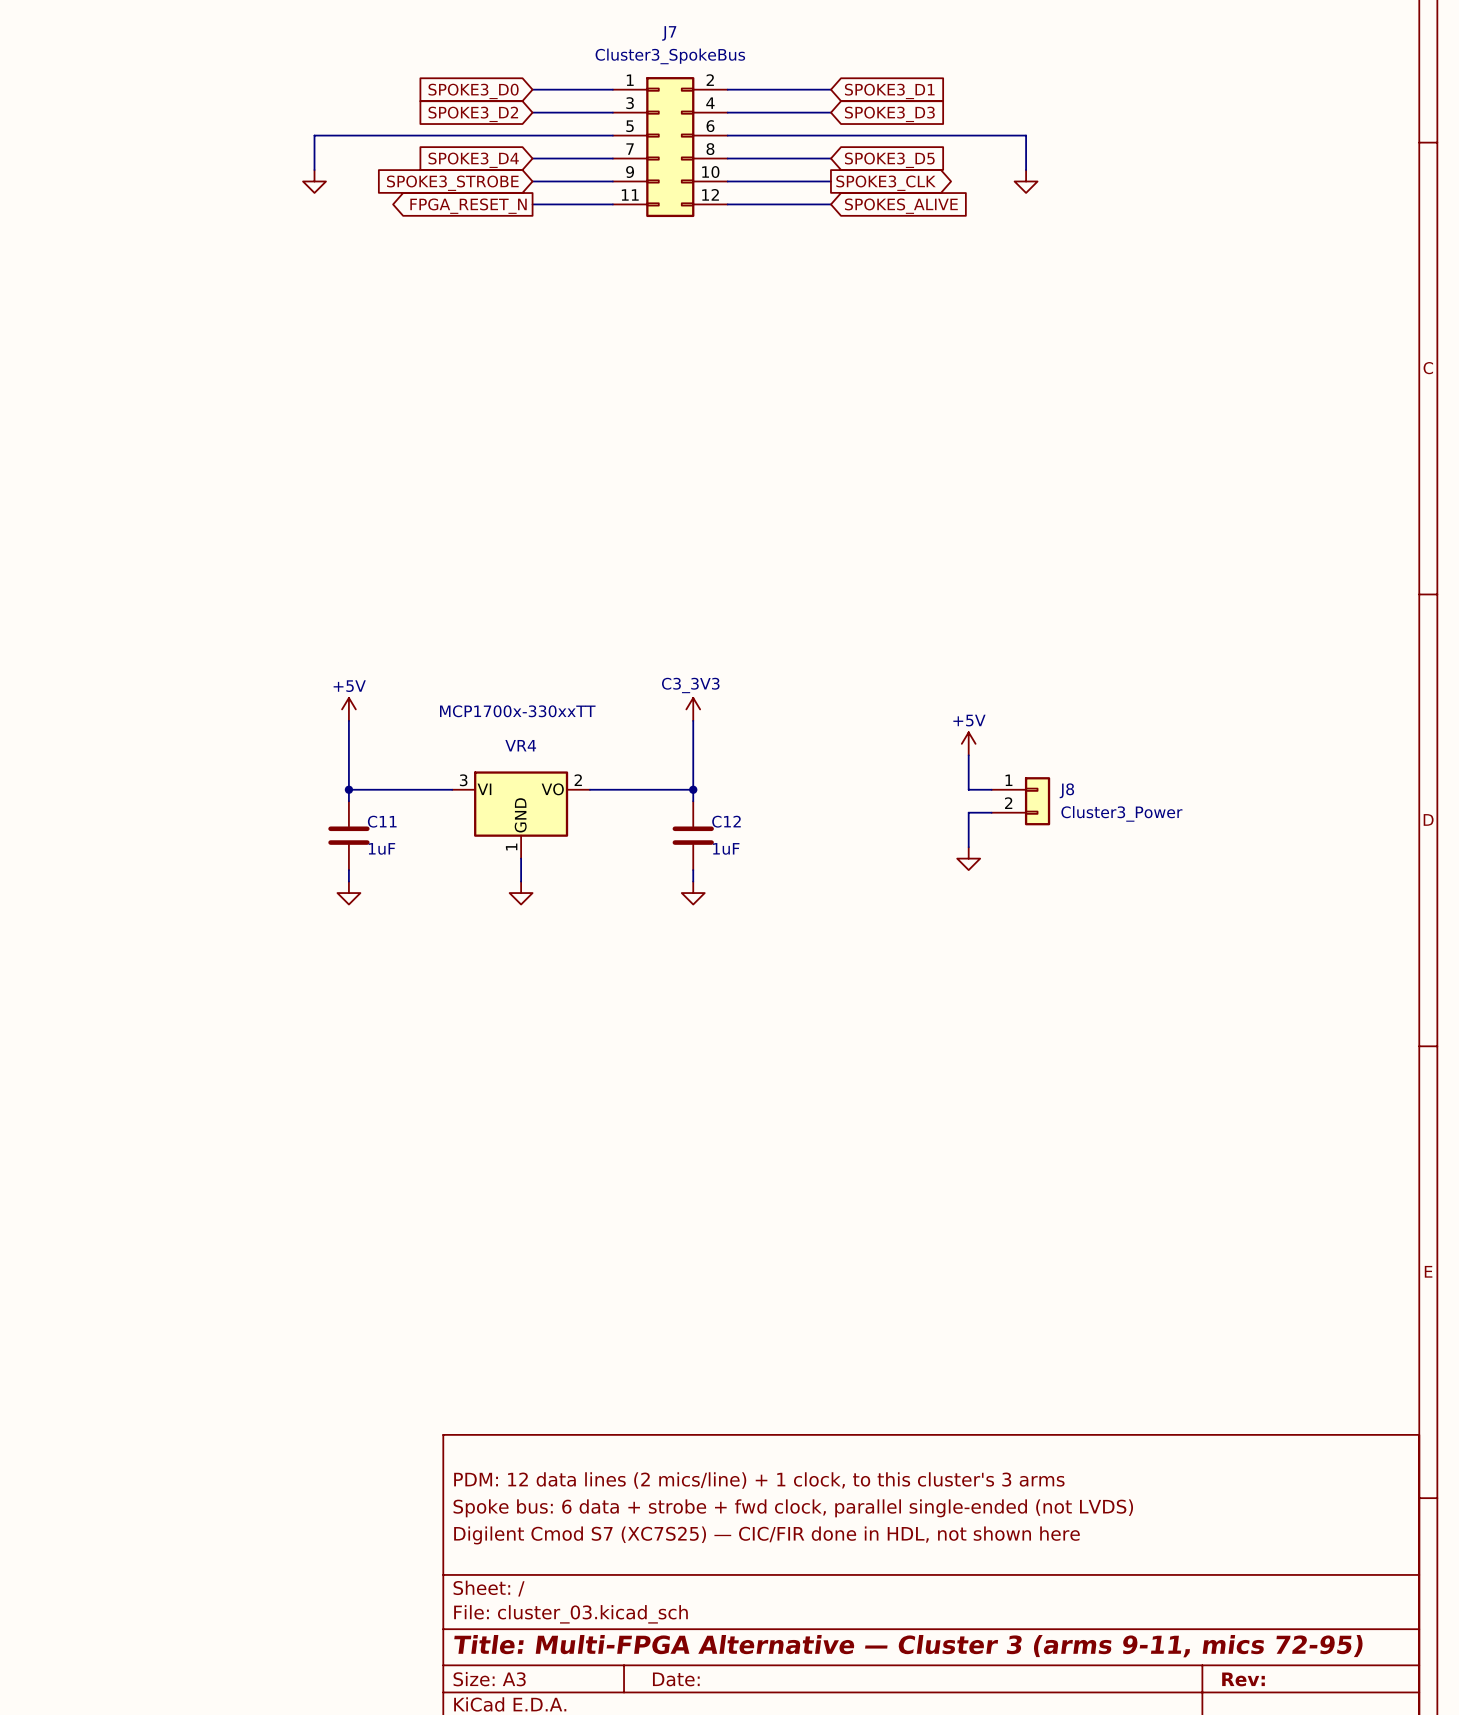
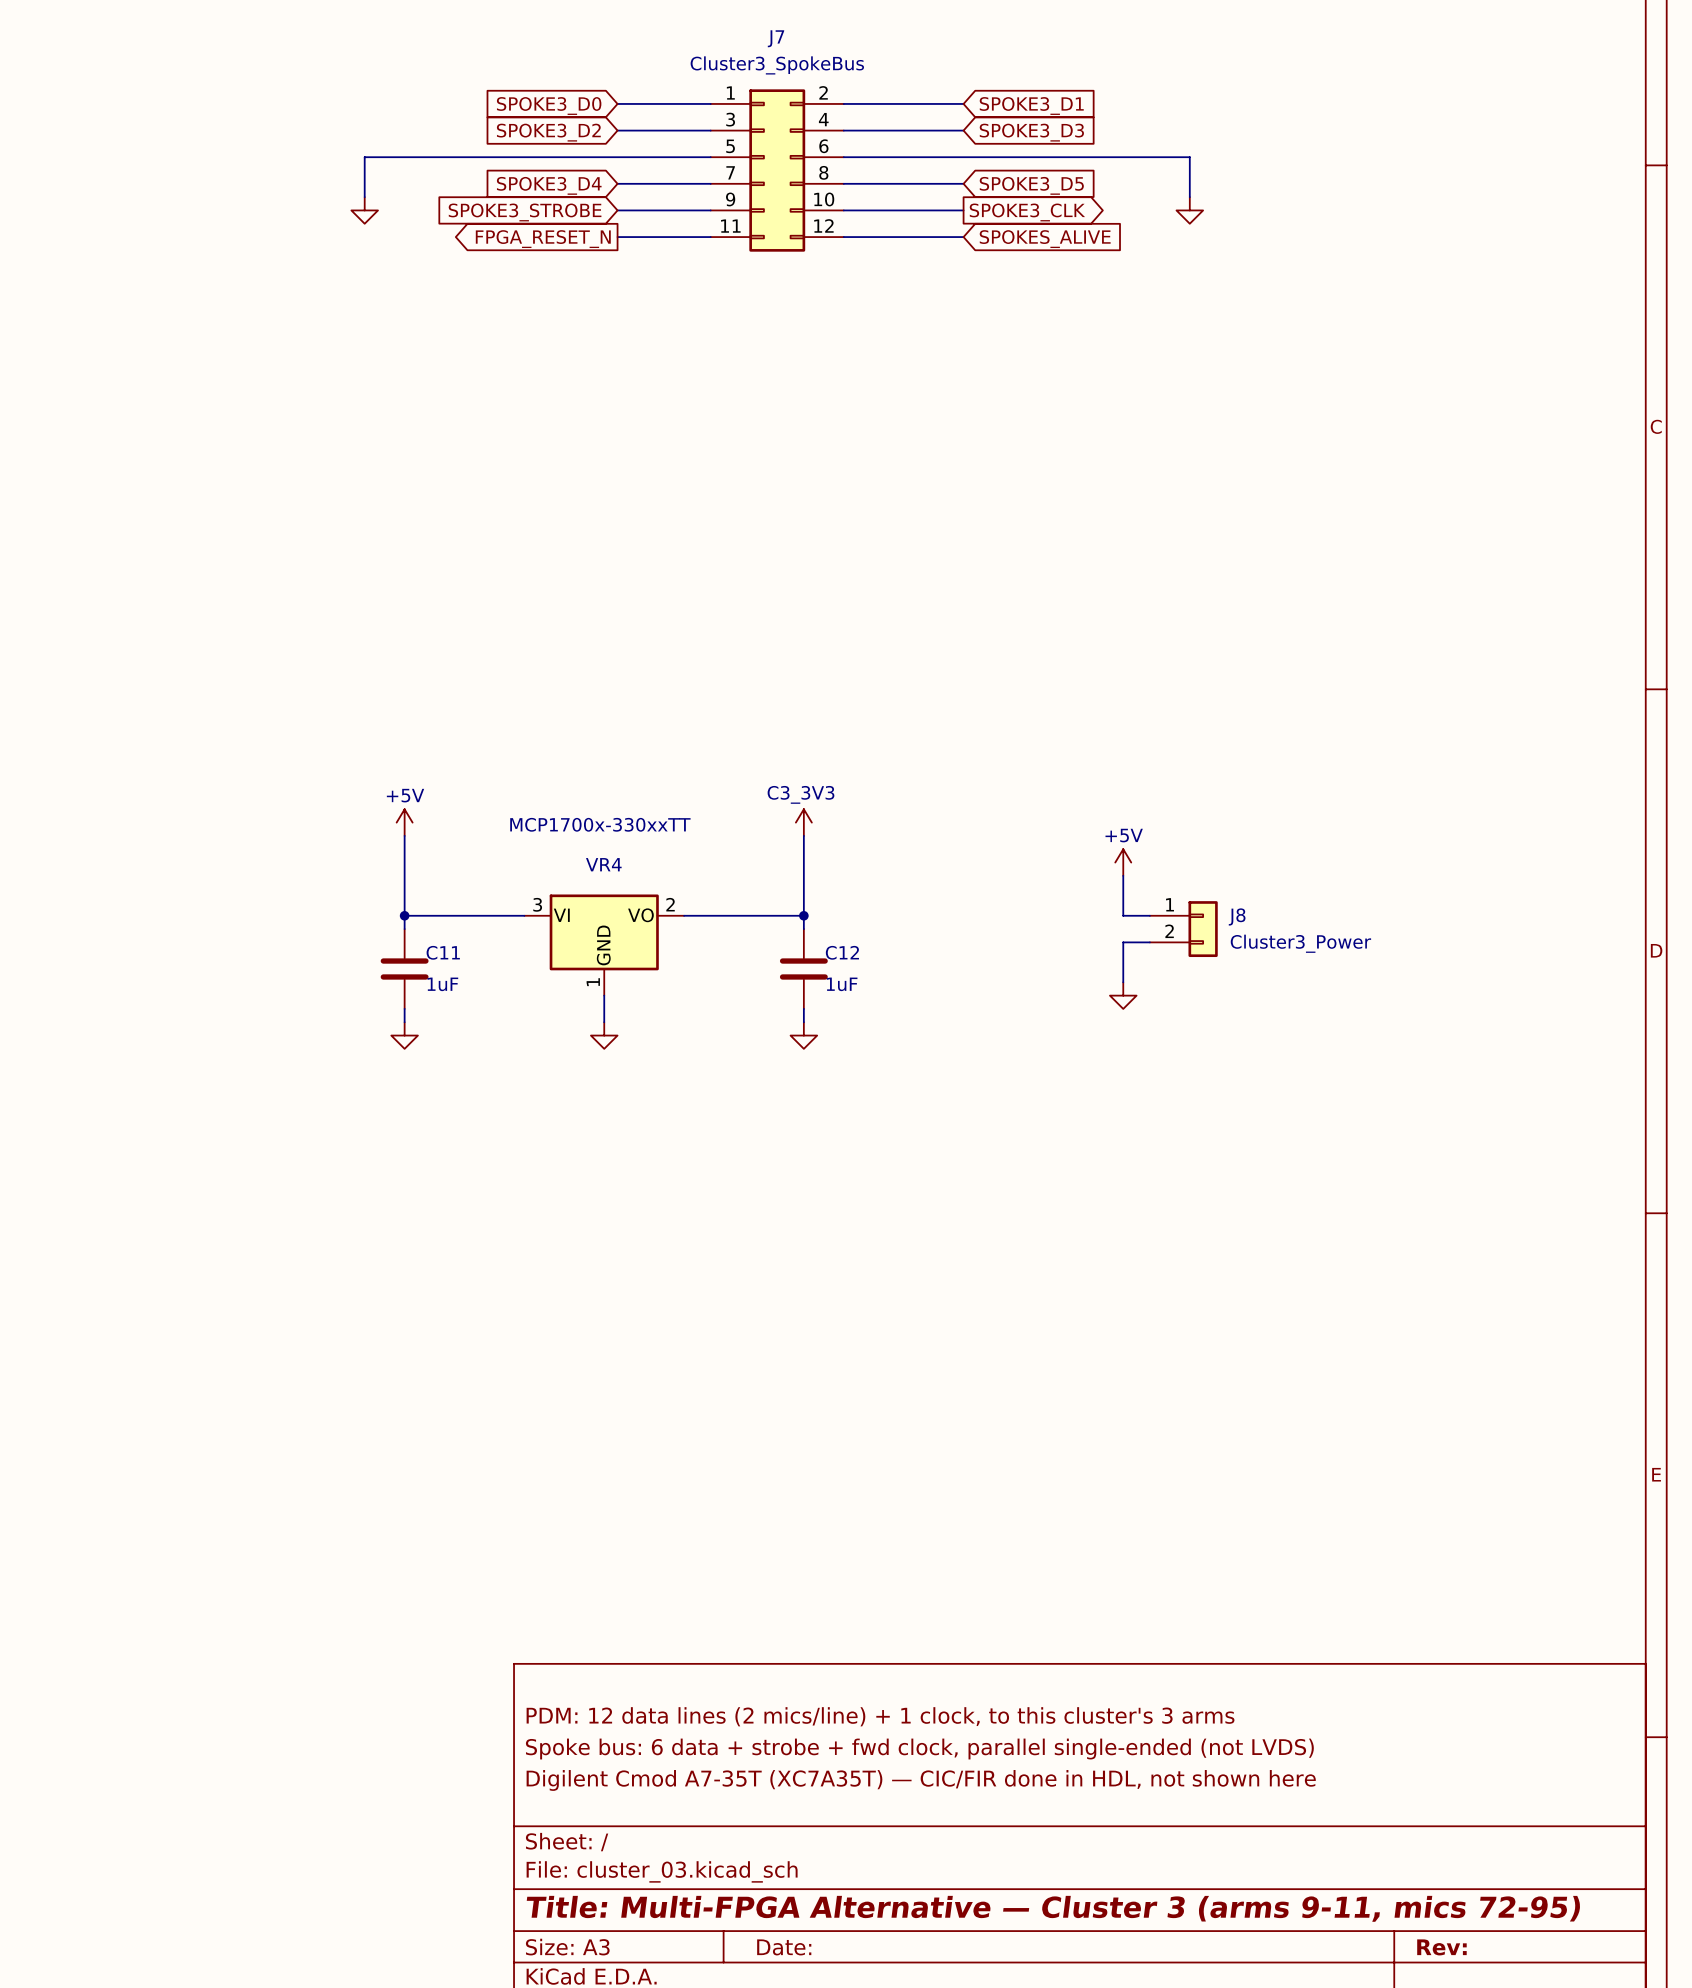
title block: Digilent Cmod S7 (XC7S25) — CIC/FIR done in HDL, not shown here (766, 1535) -> Digilent Cmod A7-35T (XC7A35T) — CIC/FIR done in HDL, not shown here (921, 1780)

